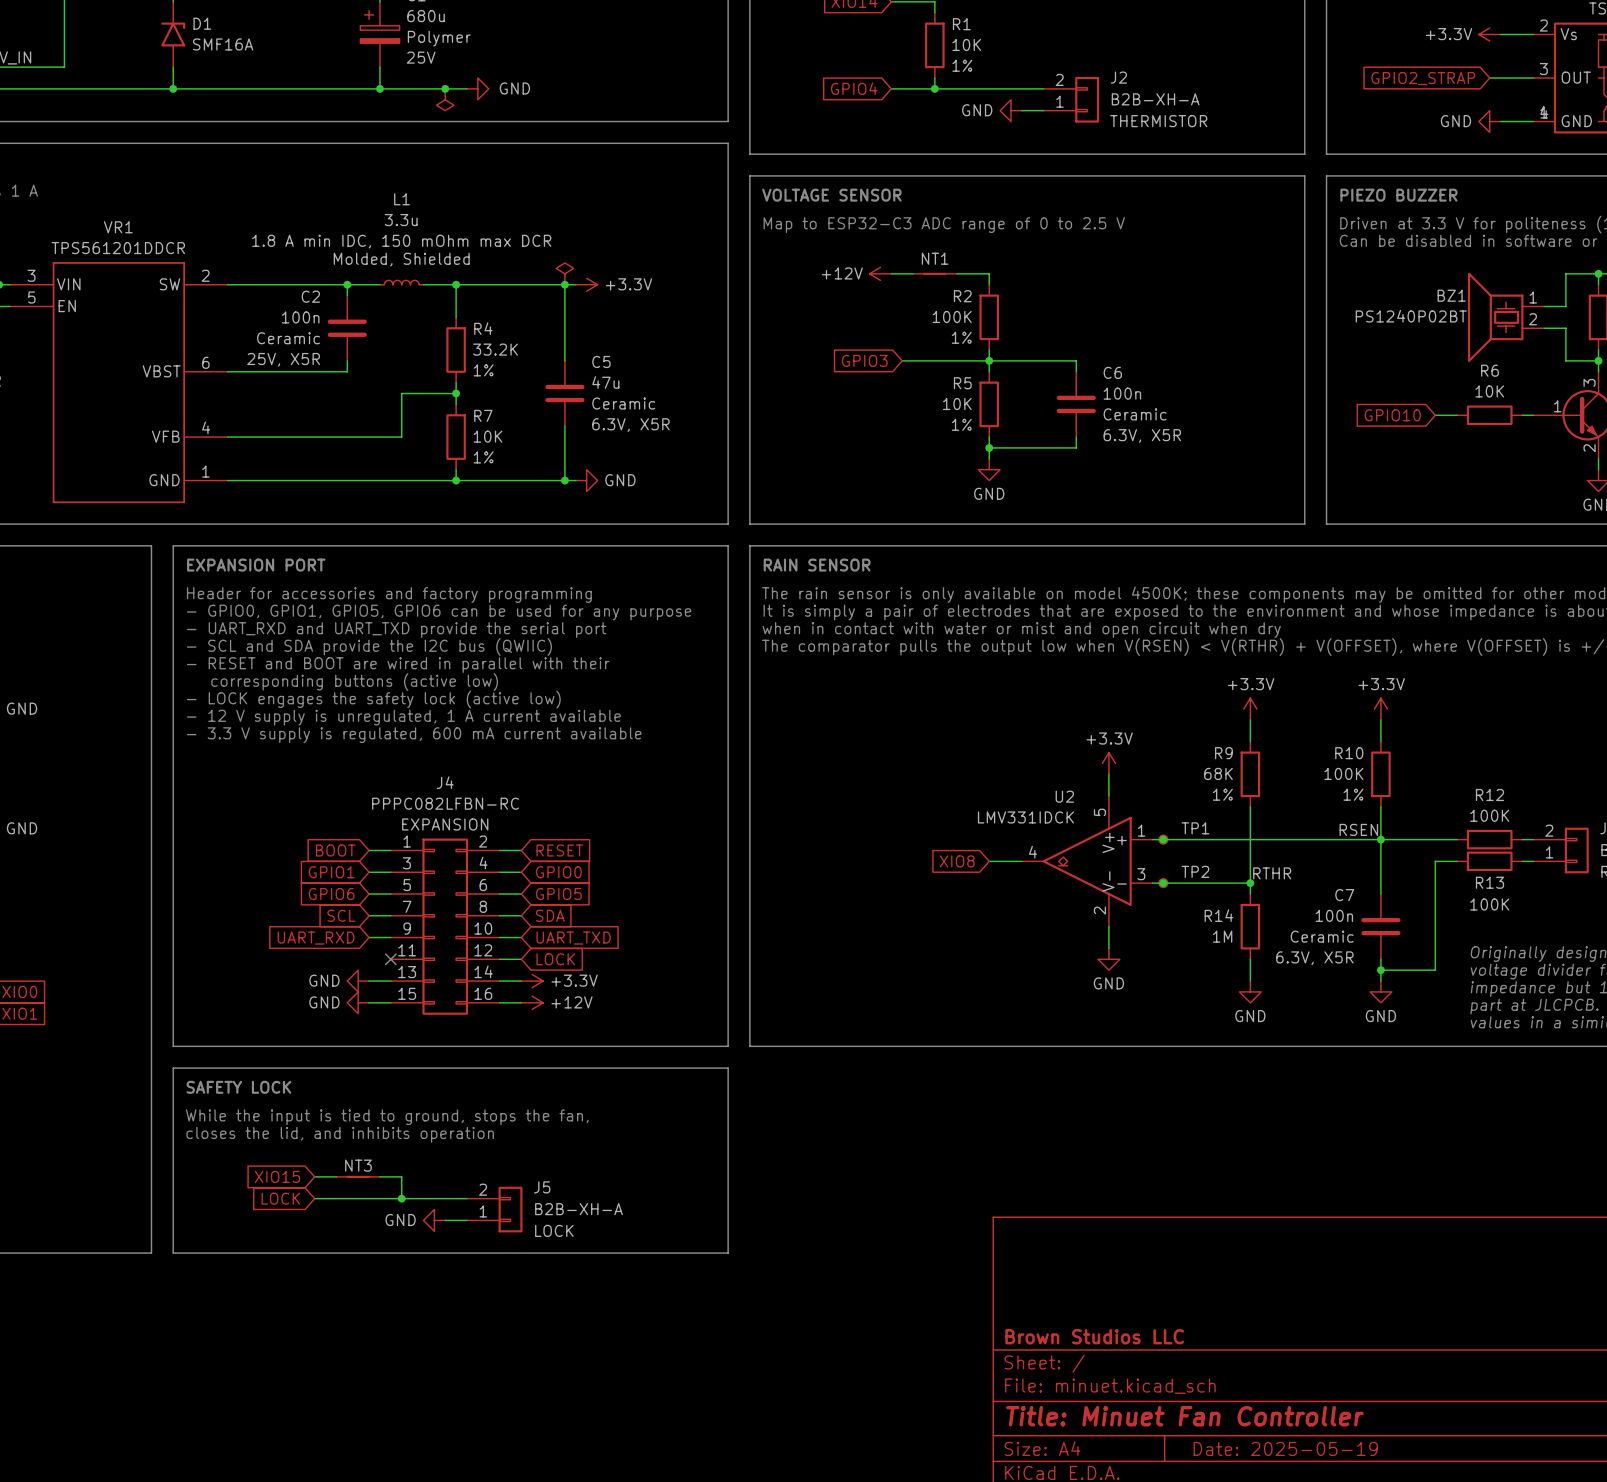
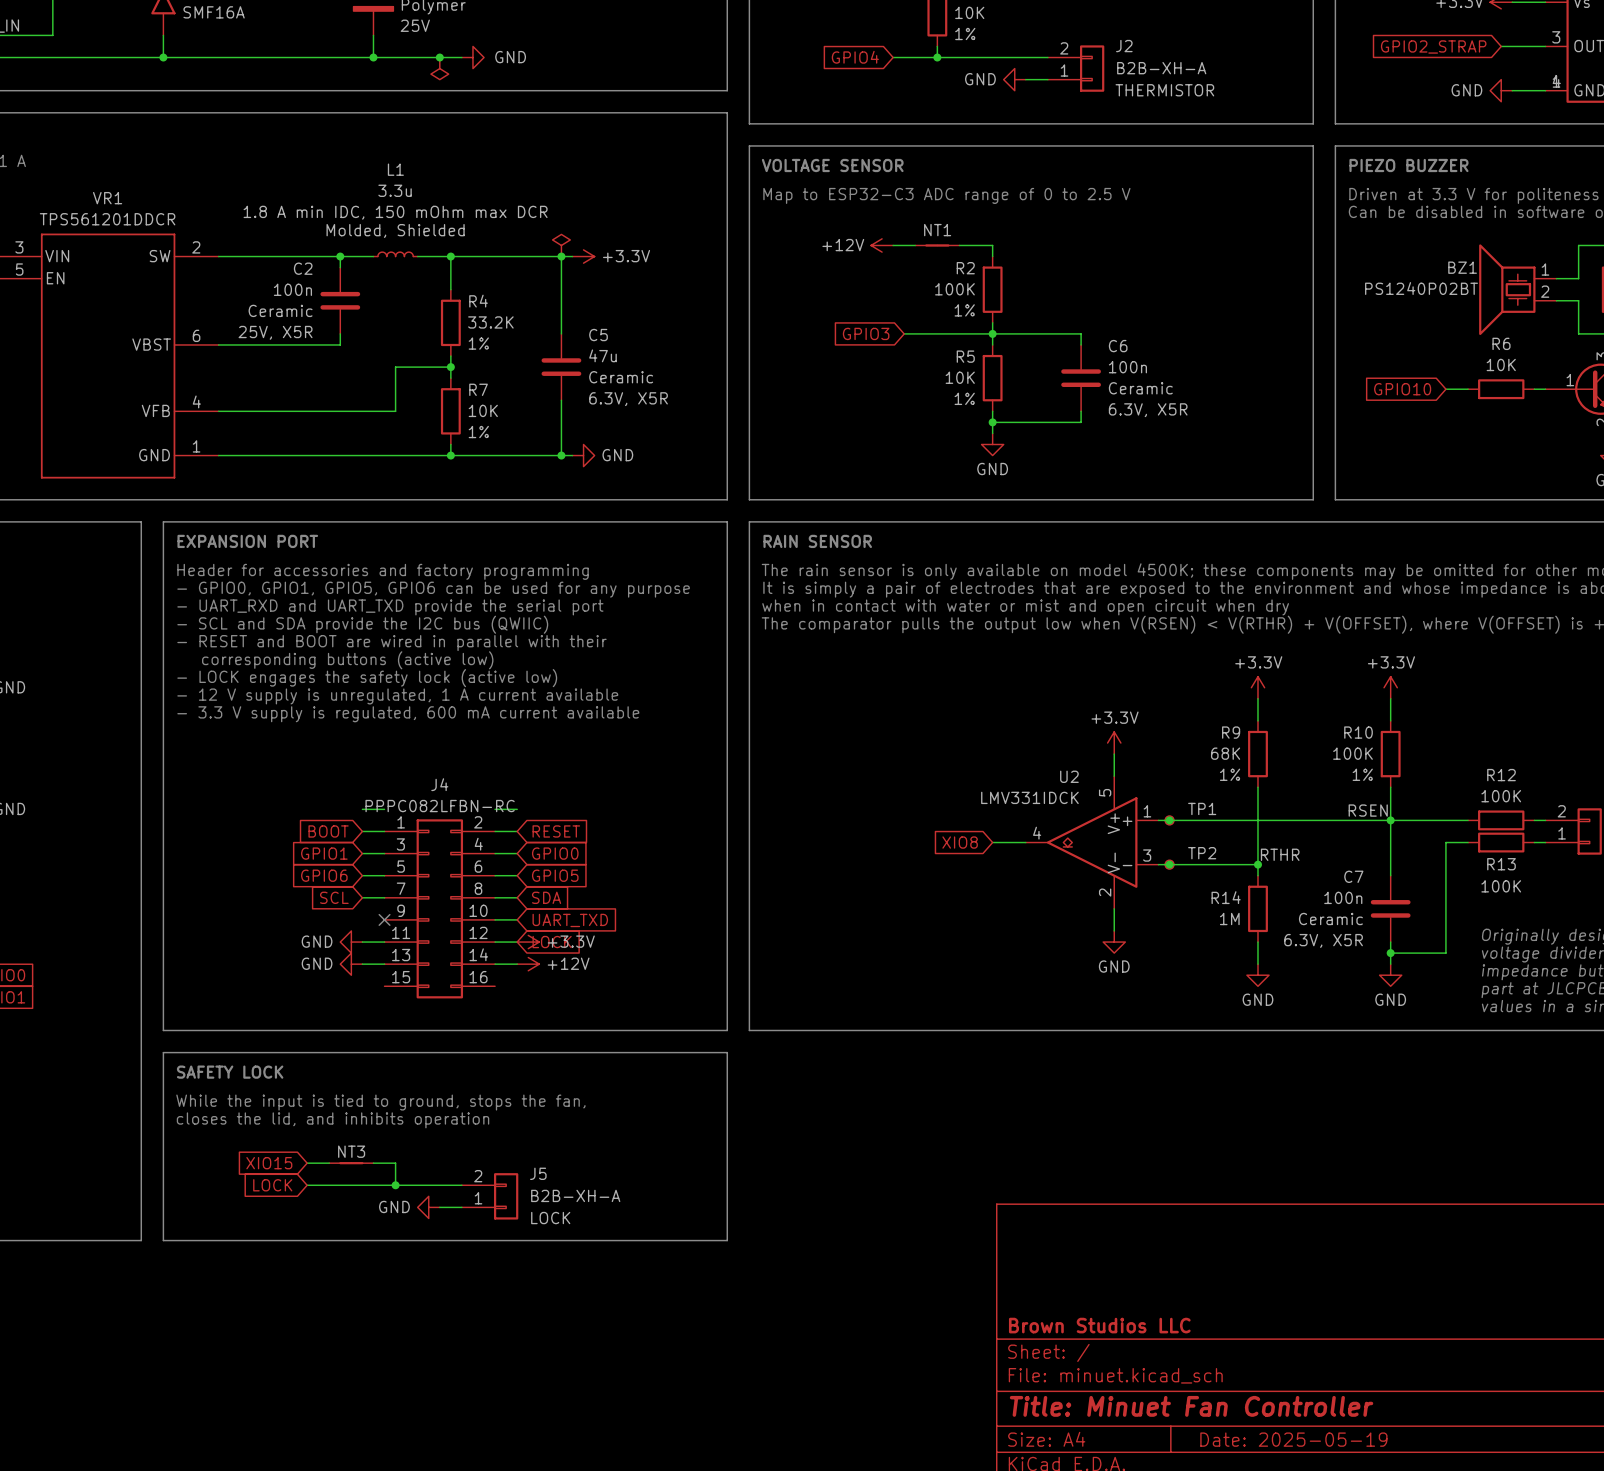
J4 name position: J4 (445, 782) -> J4 (439, 784)
J4 value position: PPPC082LFBN-RC (445, 803) -> PPPC082LFBN-RC (440, 806)
J4 text: EXPANSION (445, 824) -> none
wire: (369, 937) (390, 937) -> (362, 942) (384, 942)
global label: UART_RXD (316, 938) -> none
no-connect mark position: (390, 959) -> (384, 919)
power symbol: none -> +3.3V (528, 942)
power symbol: +3.3V (532, 981) -> +12V (528, 964)
power symbol position: GND (358, 1002) -> GND (351, 942)
wire: (369, 1002) (390, 1002) -> (362, 809) (384, 809)
wire: (499, 1002) (521, 1002) -> (495, 809) (517, 809)
power symbol: +12V (532, 1002) -> none

